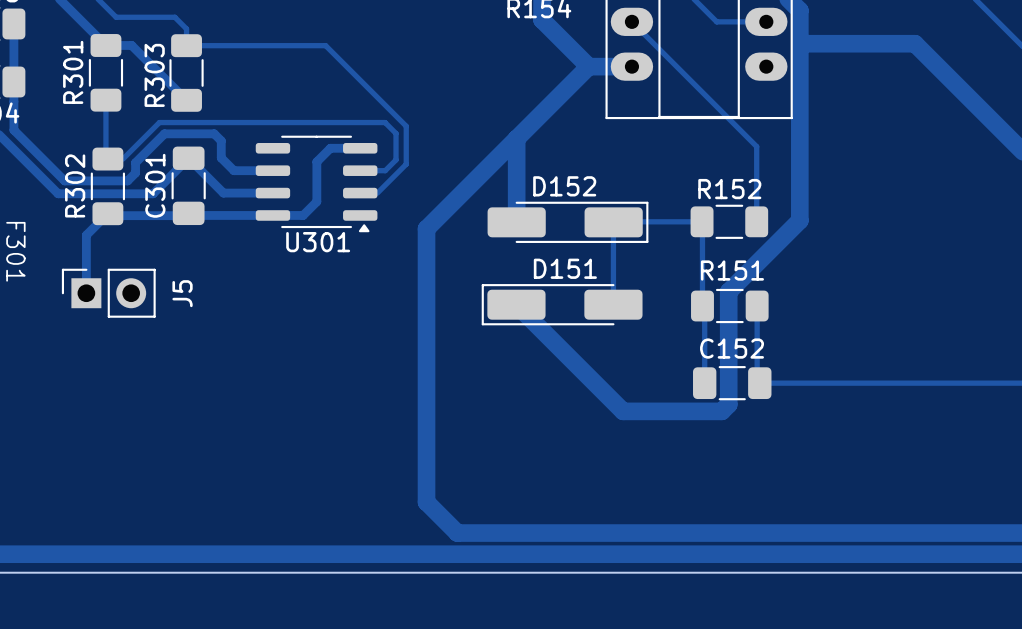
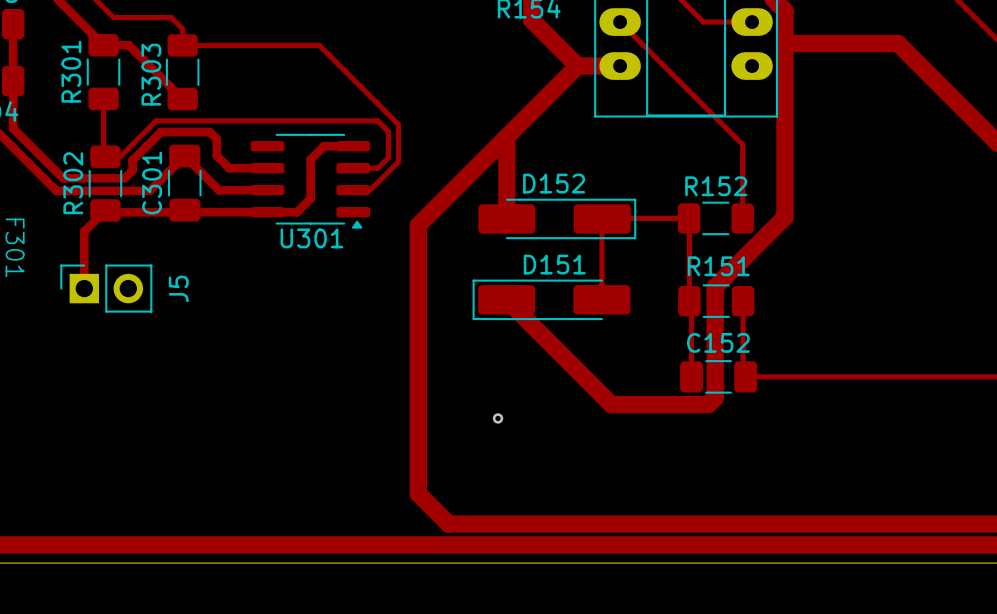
via: none -> (498, 418)

